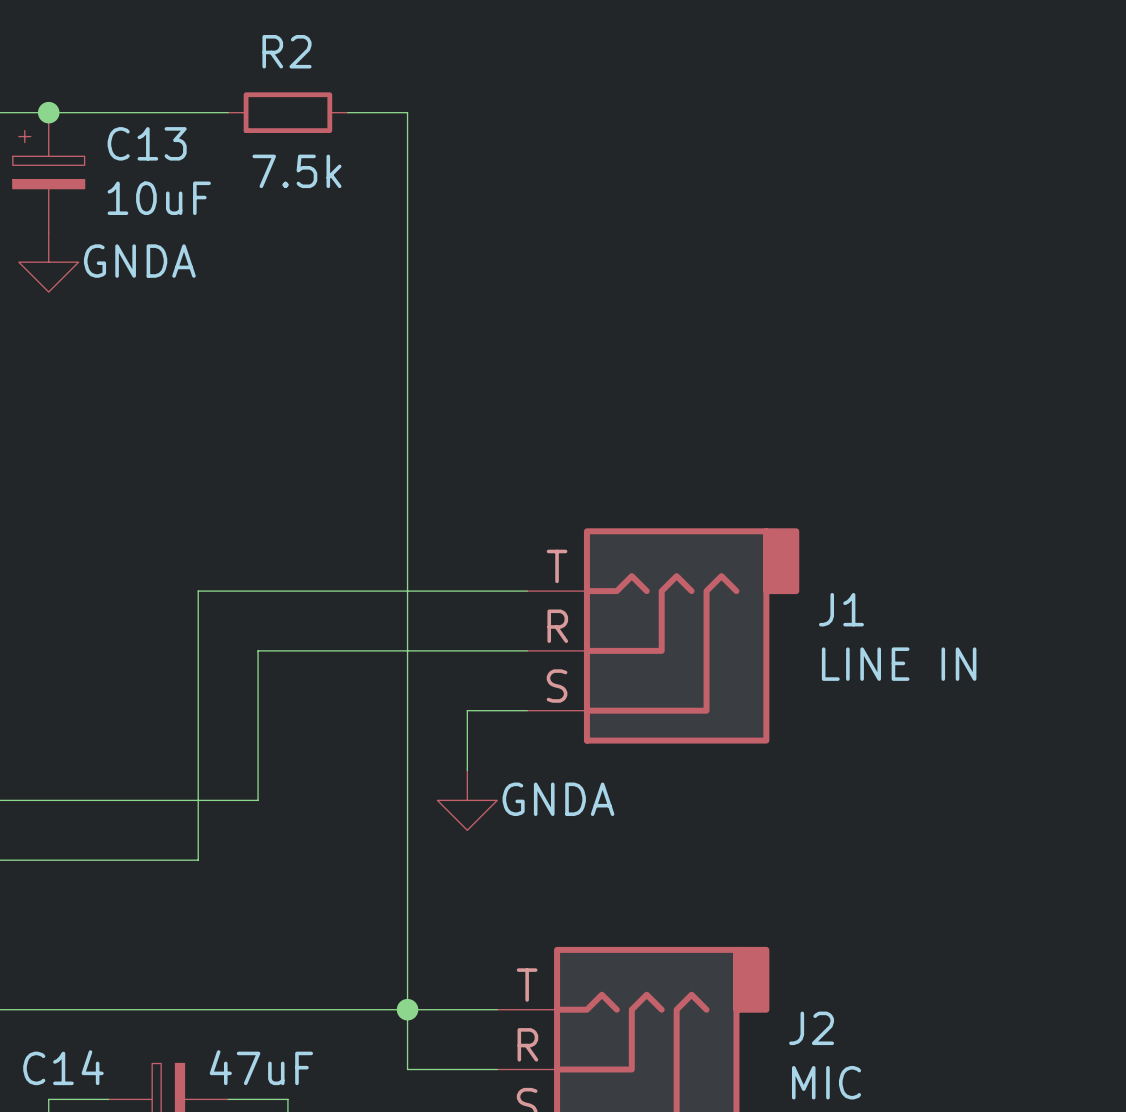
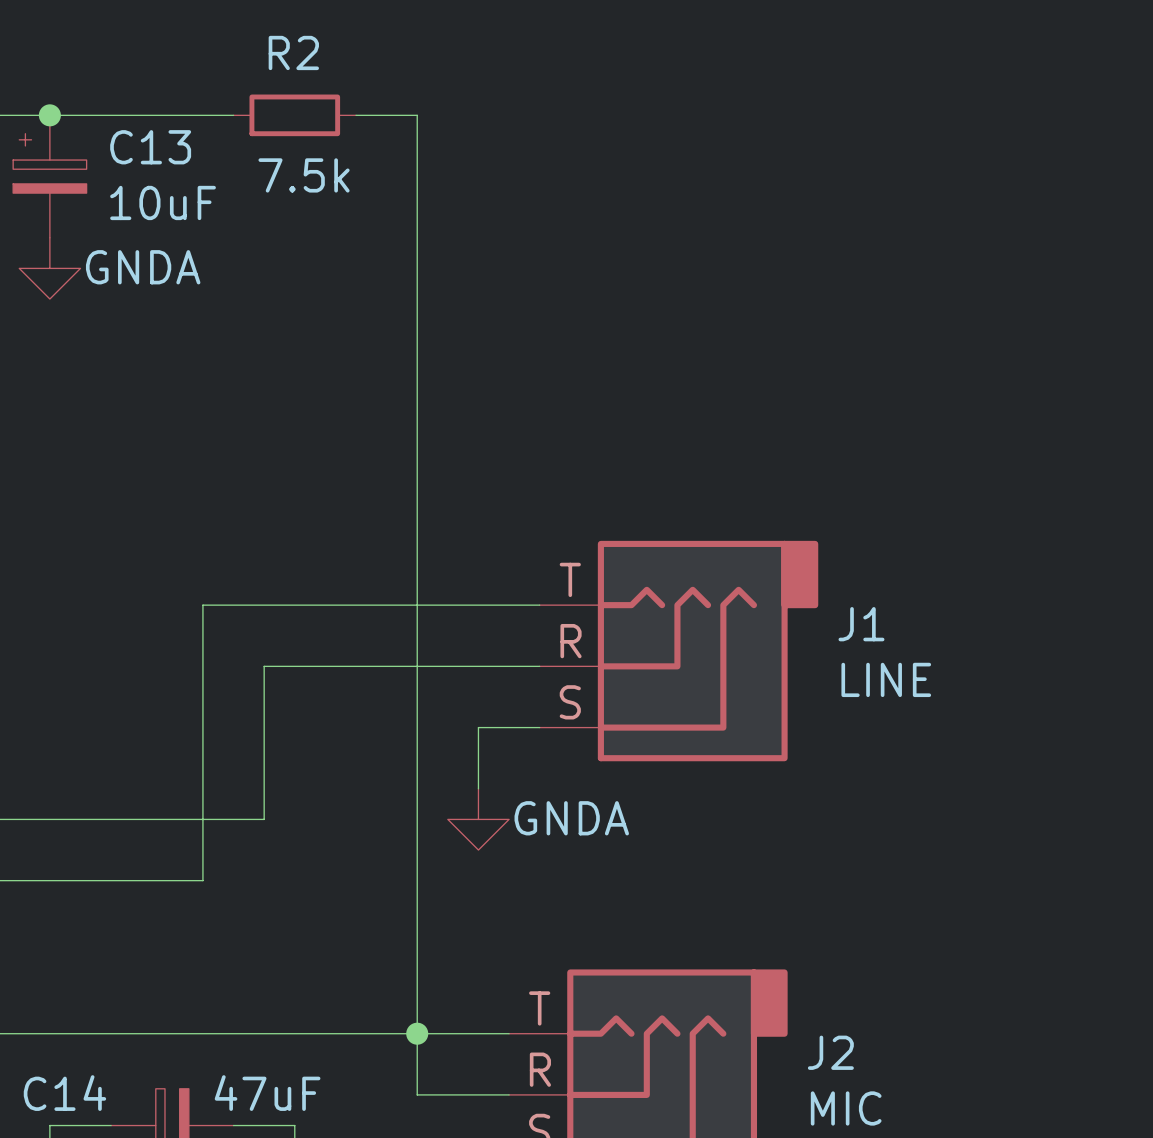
J1 value: LINE IN (899, 664) -> LINE (886, 679)

